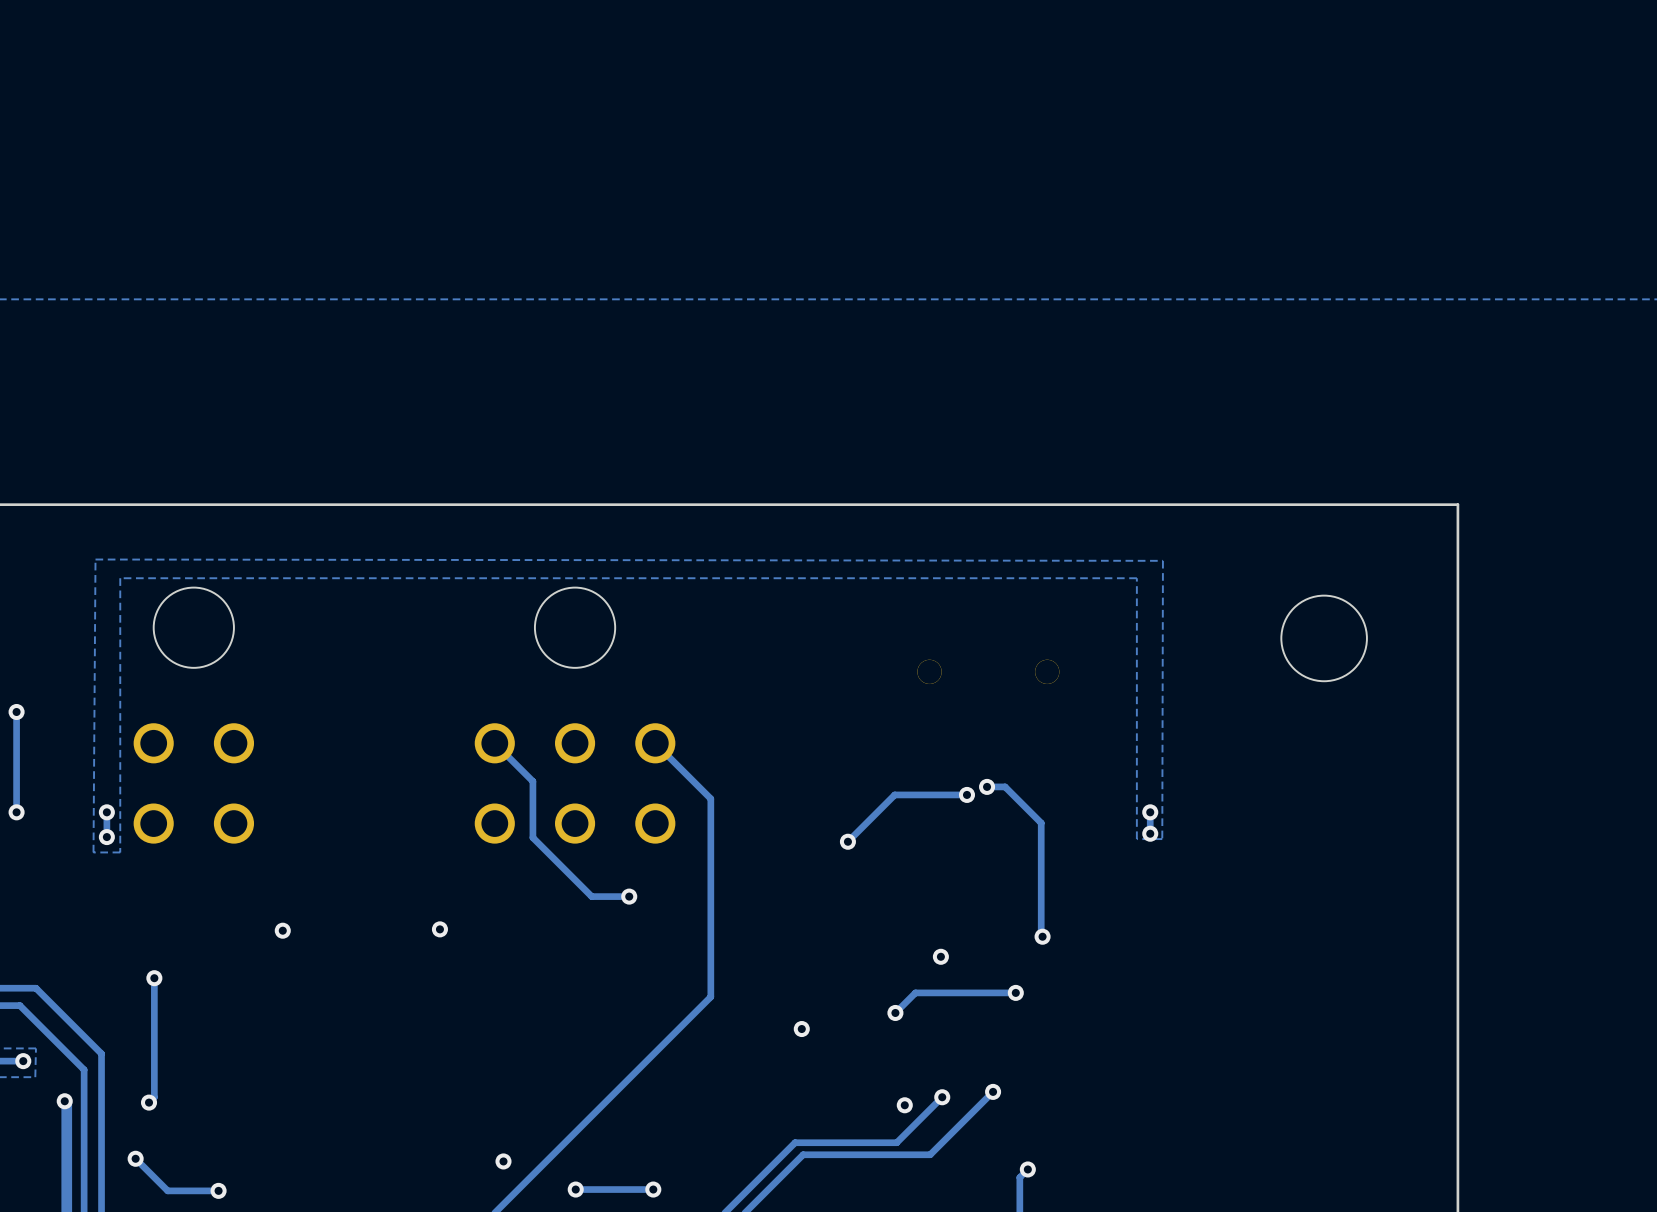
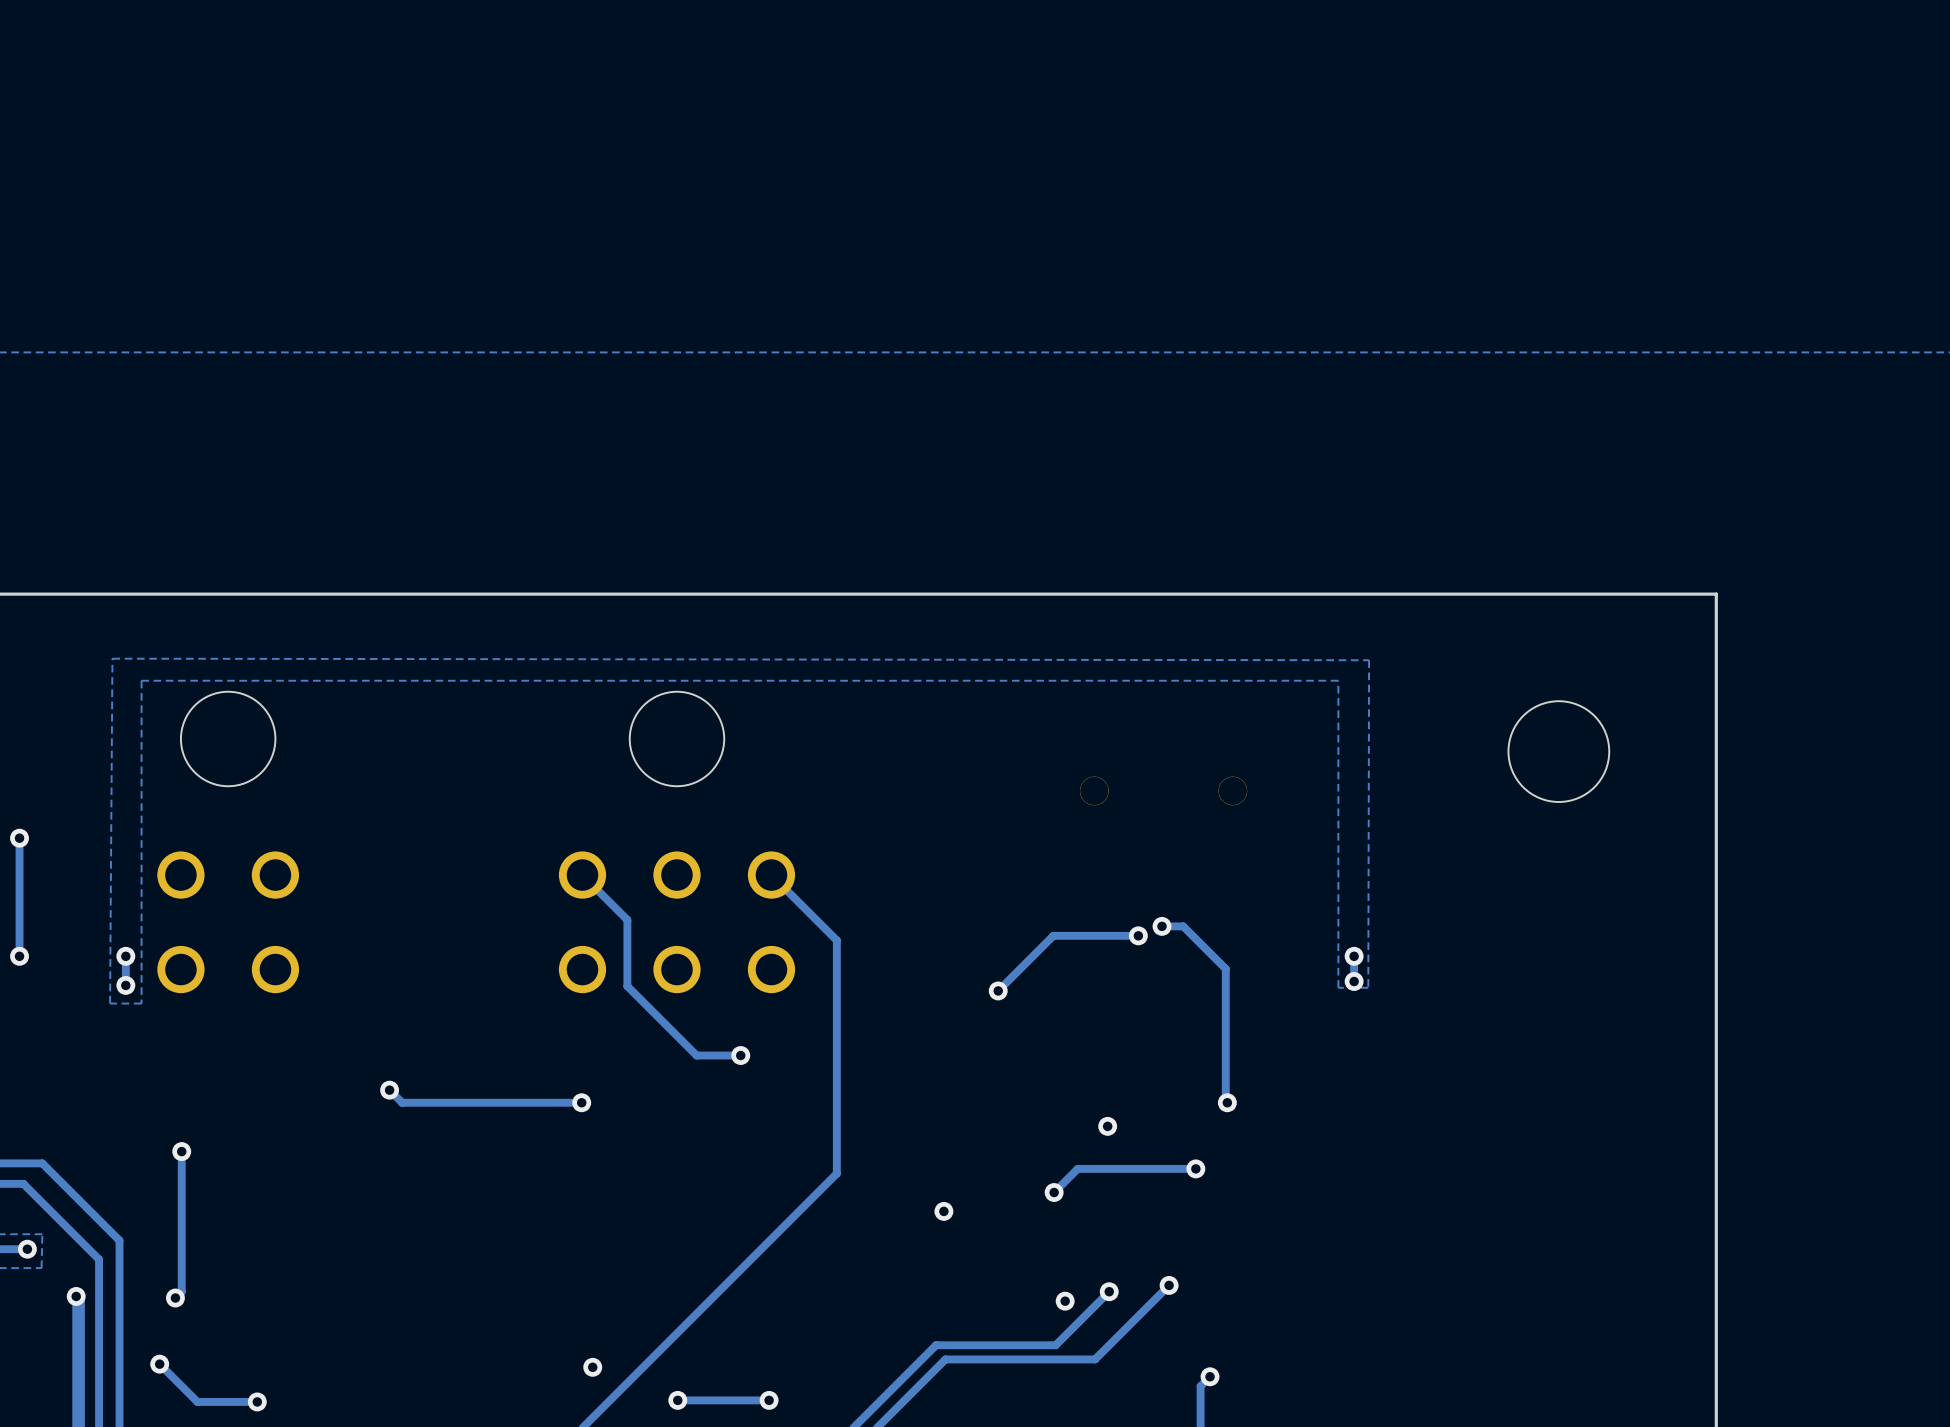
track: none -> (389, 1090) (402, 1102) (581, 1102)
via: (439, 929) -> none
via position: (282, 930) -> (389, 1090)
via: none -> (581, 1102)

